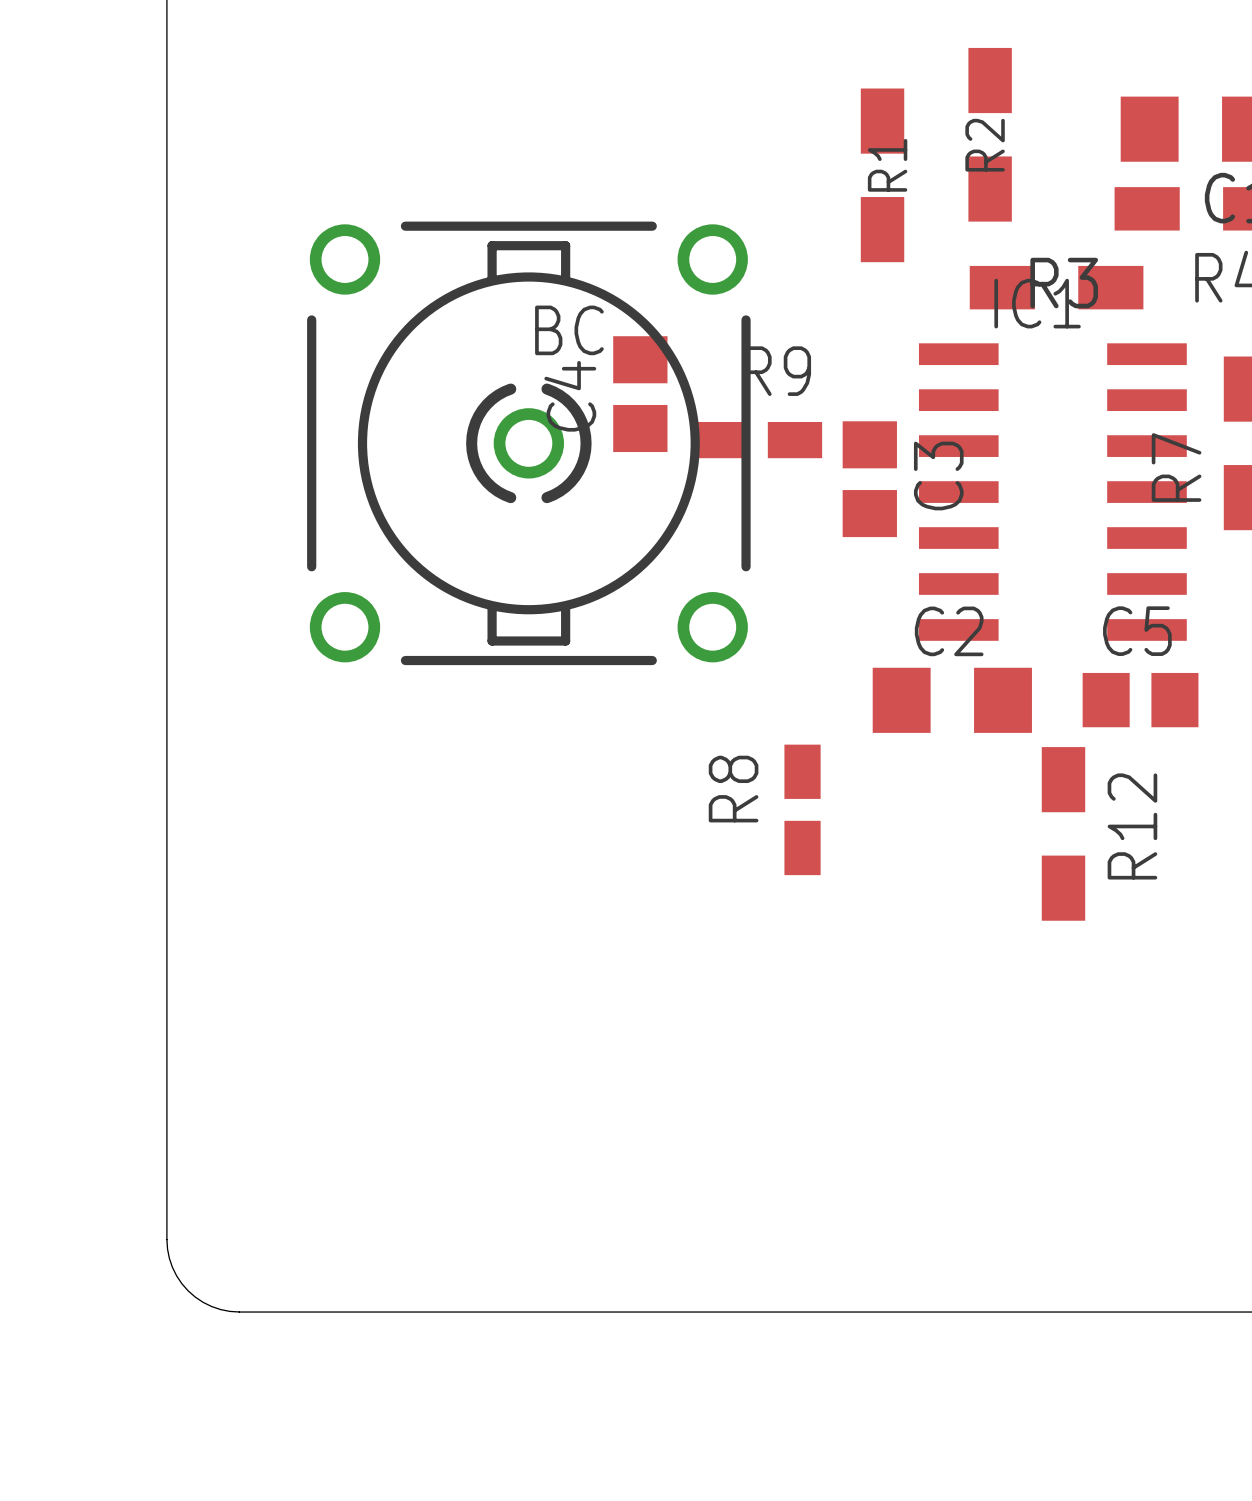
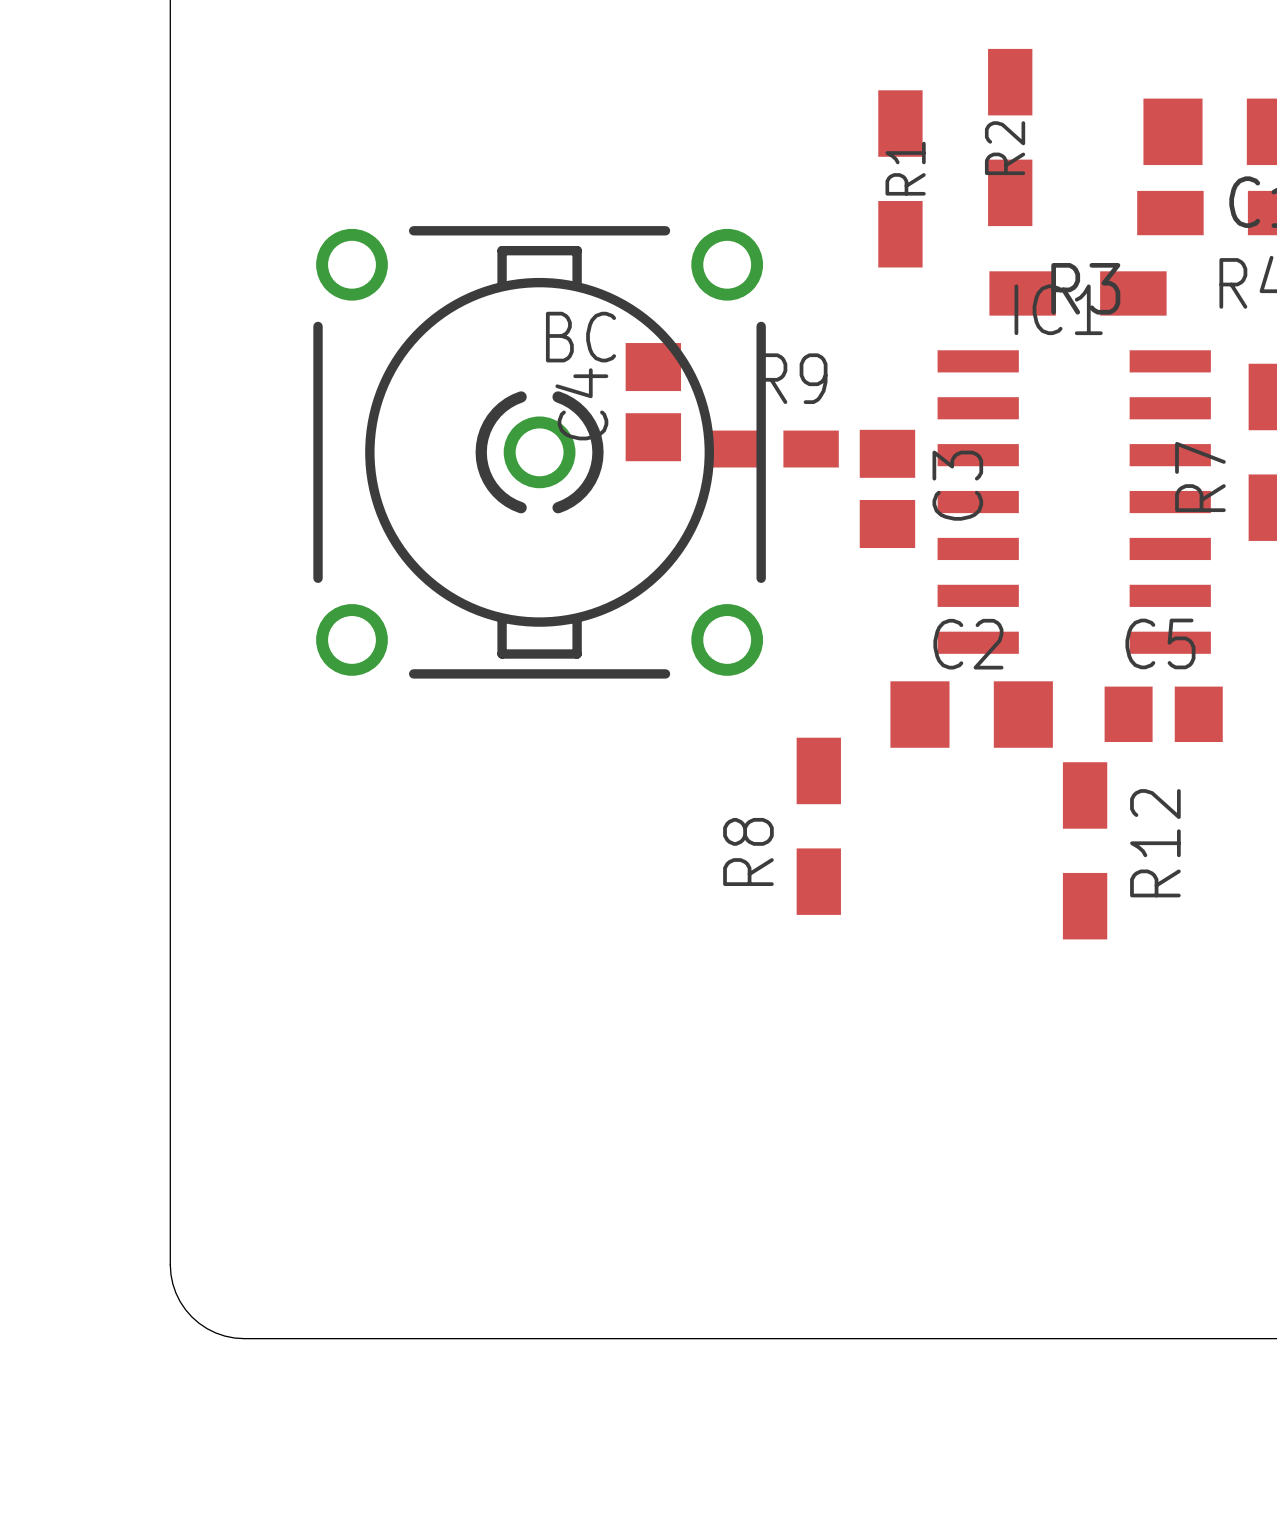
R8 footprint: [784, 744, 821, 876] -> [796, 737, 841, 915]
R8 name position: R8 (733, 789) -> R8 (748, 851)

